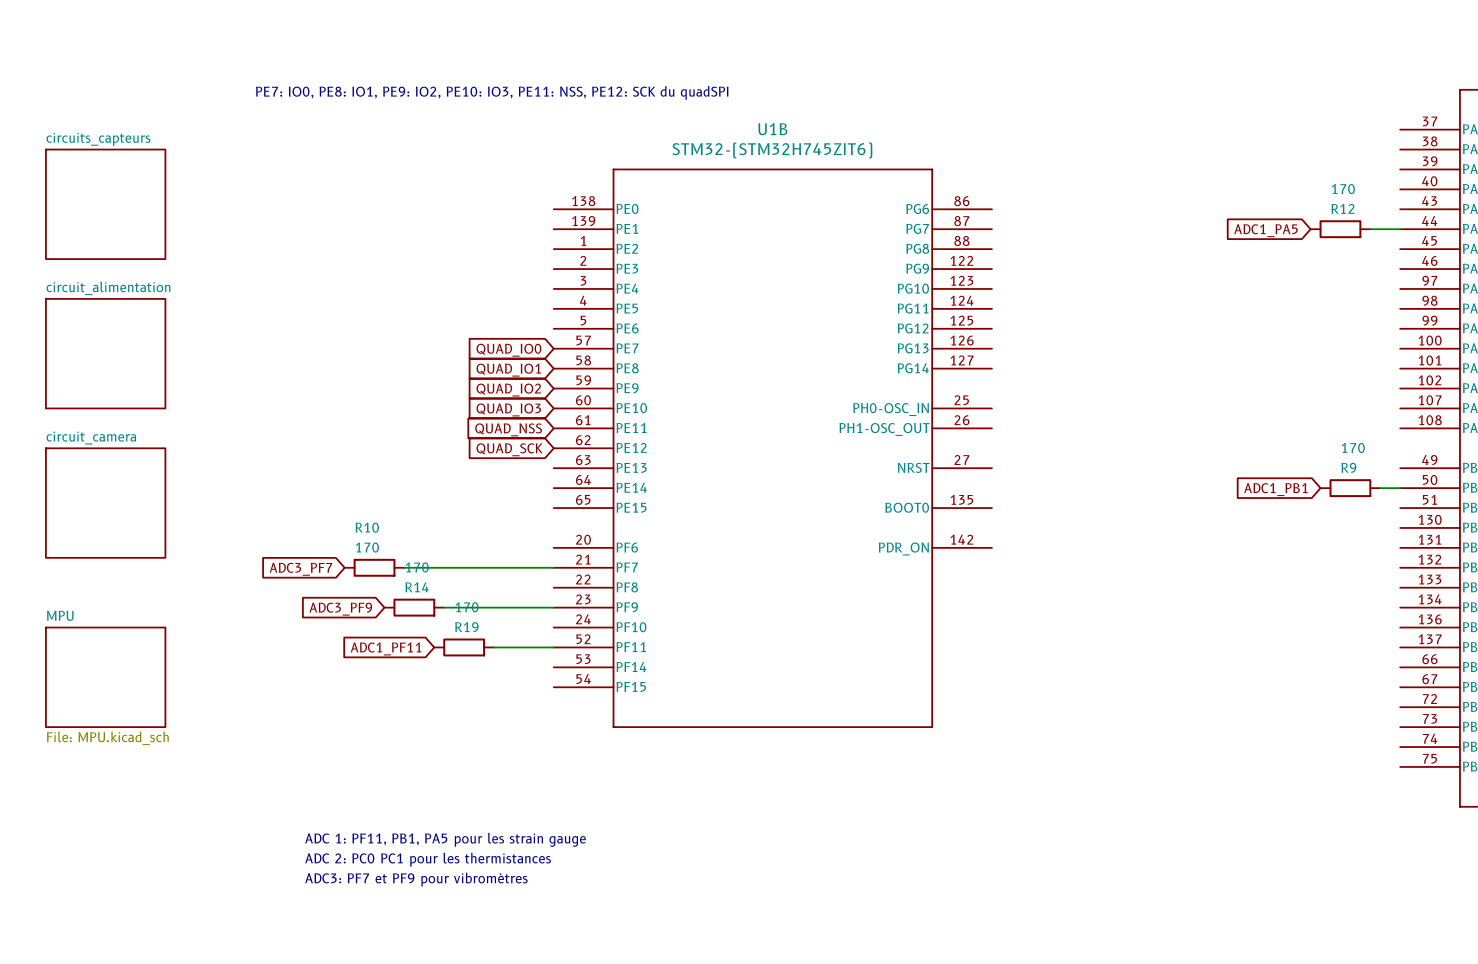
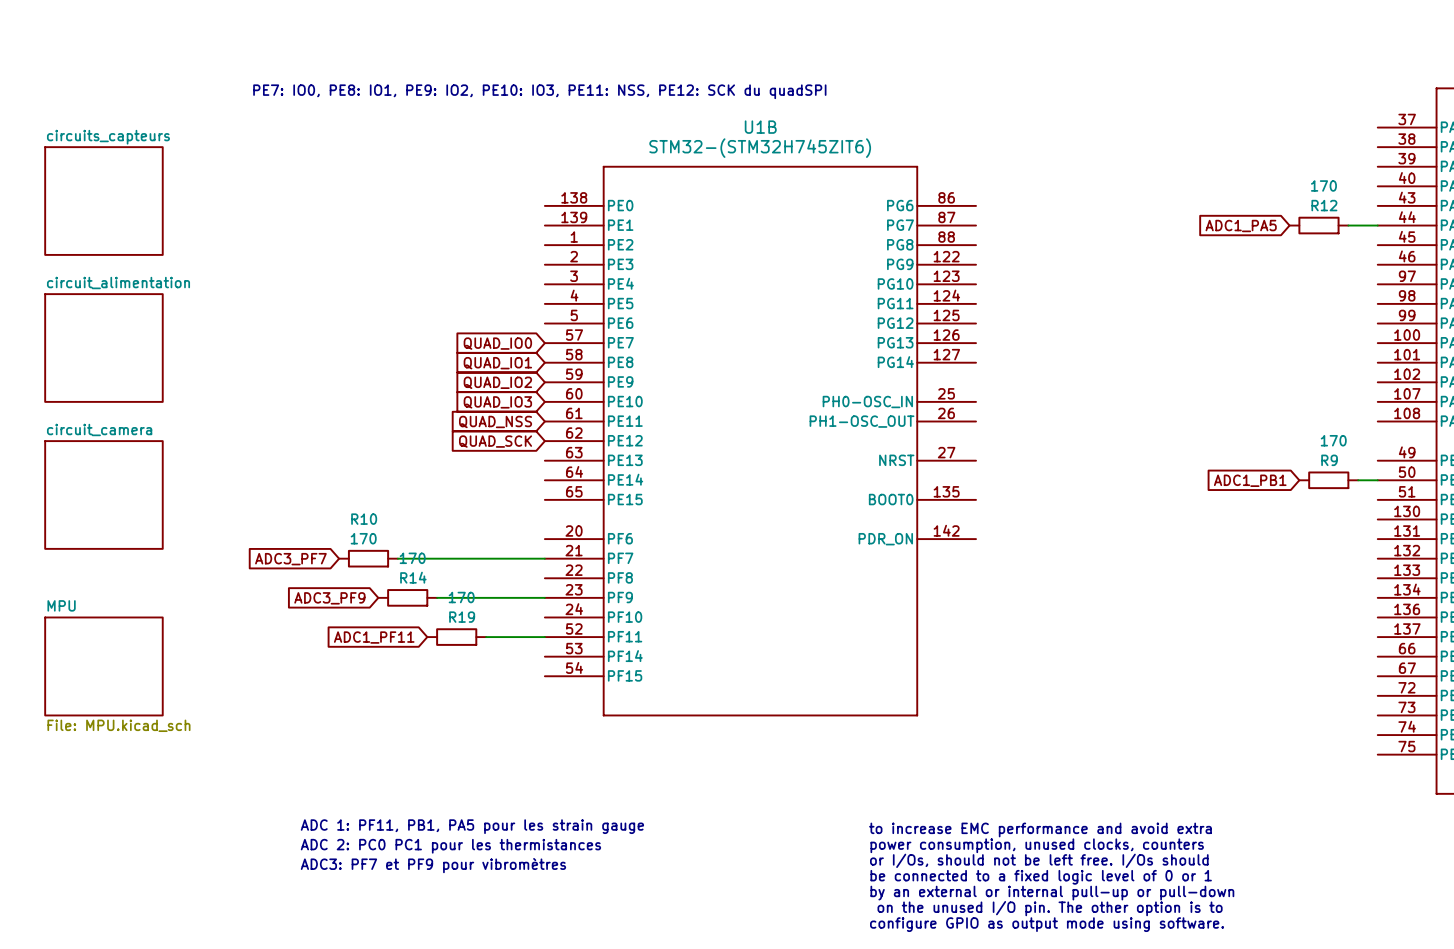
text: none -> to increase EMC performance and avoid extra (1040, 829)
text: none -> power consumption, unused clocks, counters (1037, 845)
text: none -> or I/Os, should not be left free. I/Os should (1039, 860)
text: none -> be connected to a fixed logic level of 0 or 1 (1041, 877)
text: none -> by an external or internal pull-up or pull-down (1052, 893)
text: none -> on the unused I/O pin. The other option is to (1050, 908)
text: none -> configure GPIO as output mode using software. (1047, 924)

